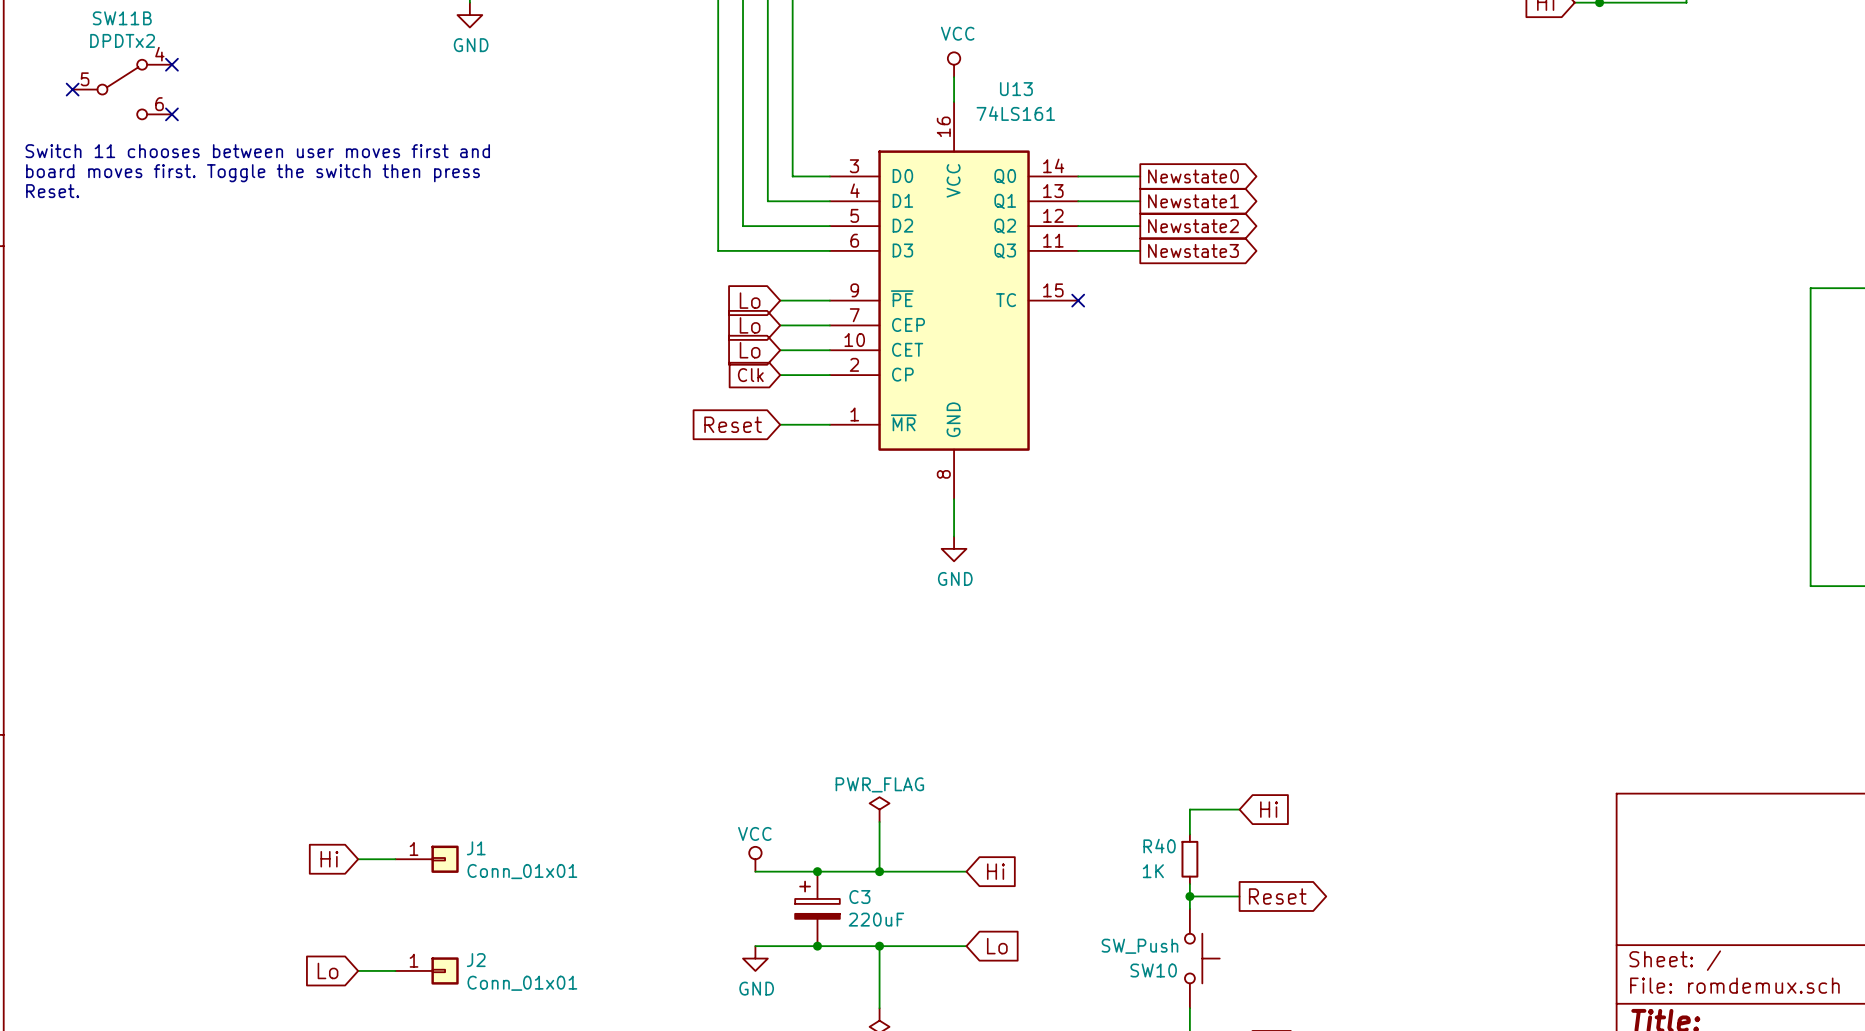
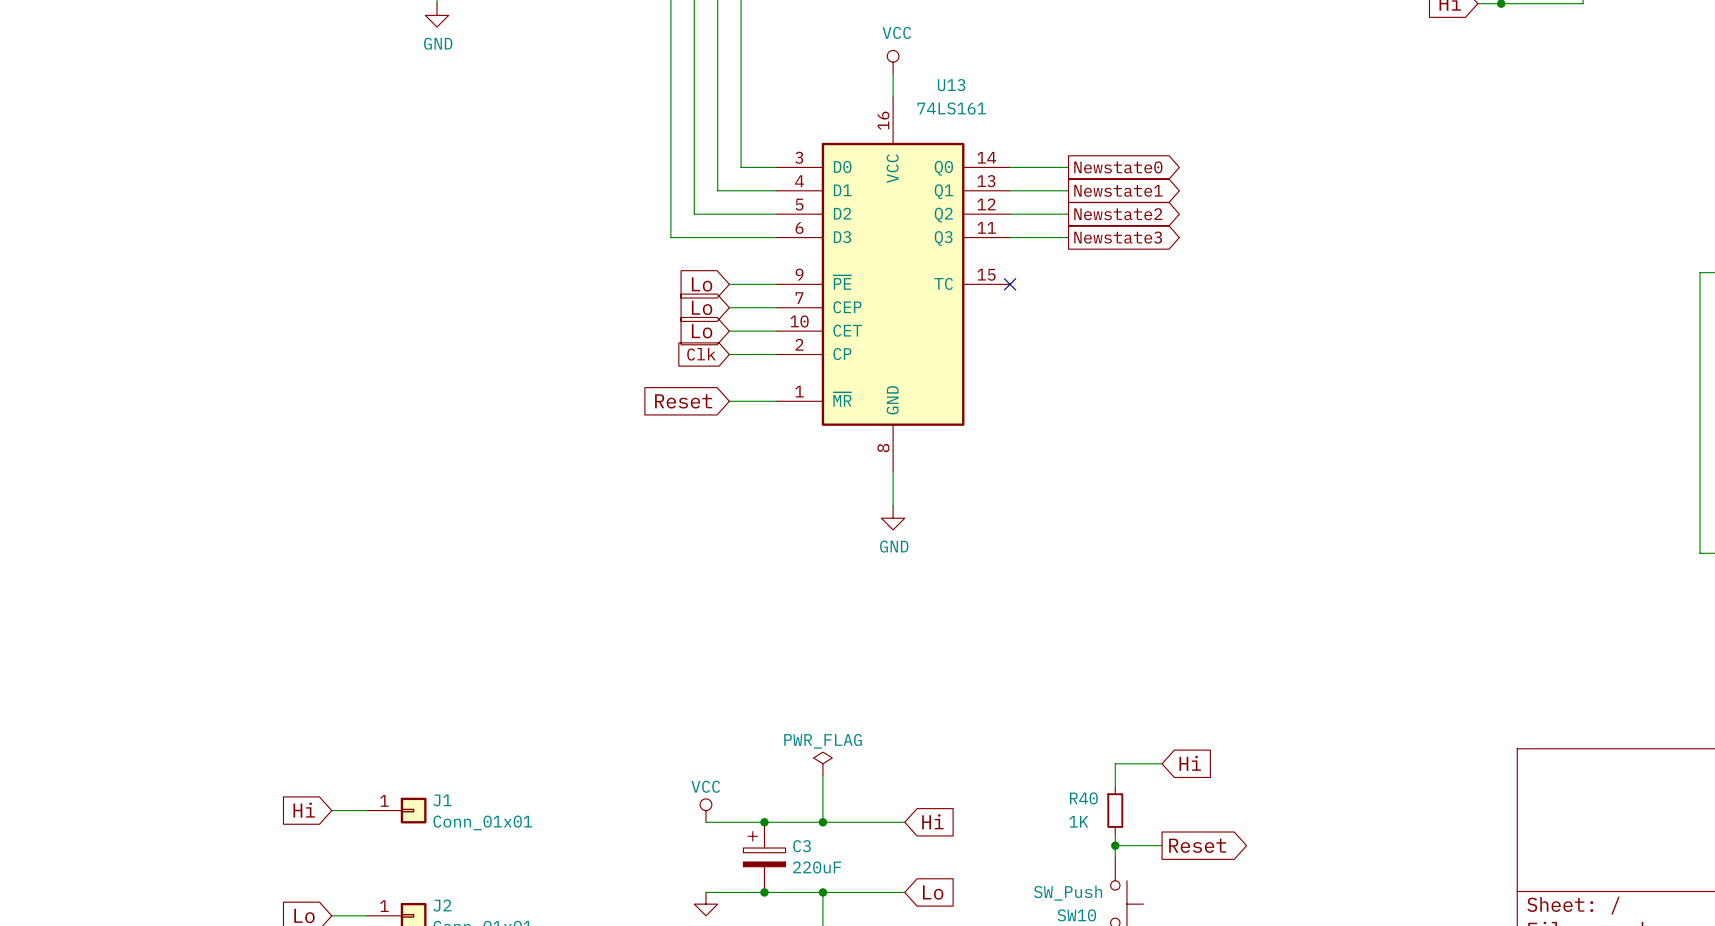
no-connect mark: (171, 64) -> none
no-connect mark: (72, 89) -> none
SW11B: DPDTx2 (122, 89) -> none
no-connect mark: (171, 114) -> none
text: Switch 11 chooses between user moves first and (257, 151) -> none
text: board moves first. Toggle the switch then press (253, 173) -> none
text: Reset. (52, 191) -> none

